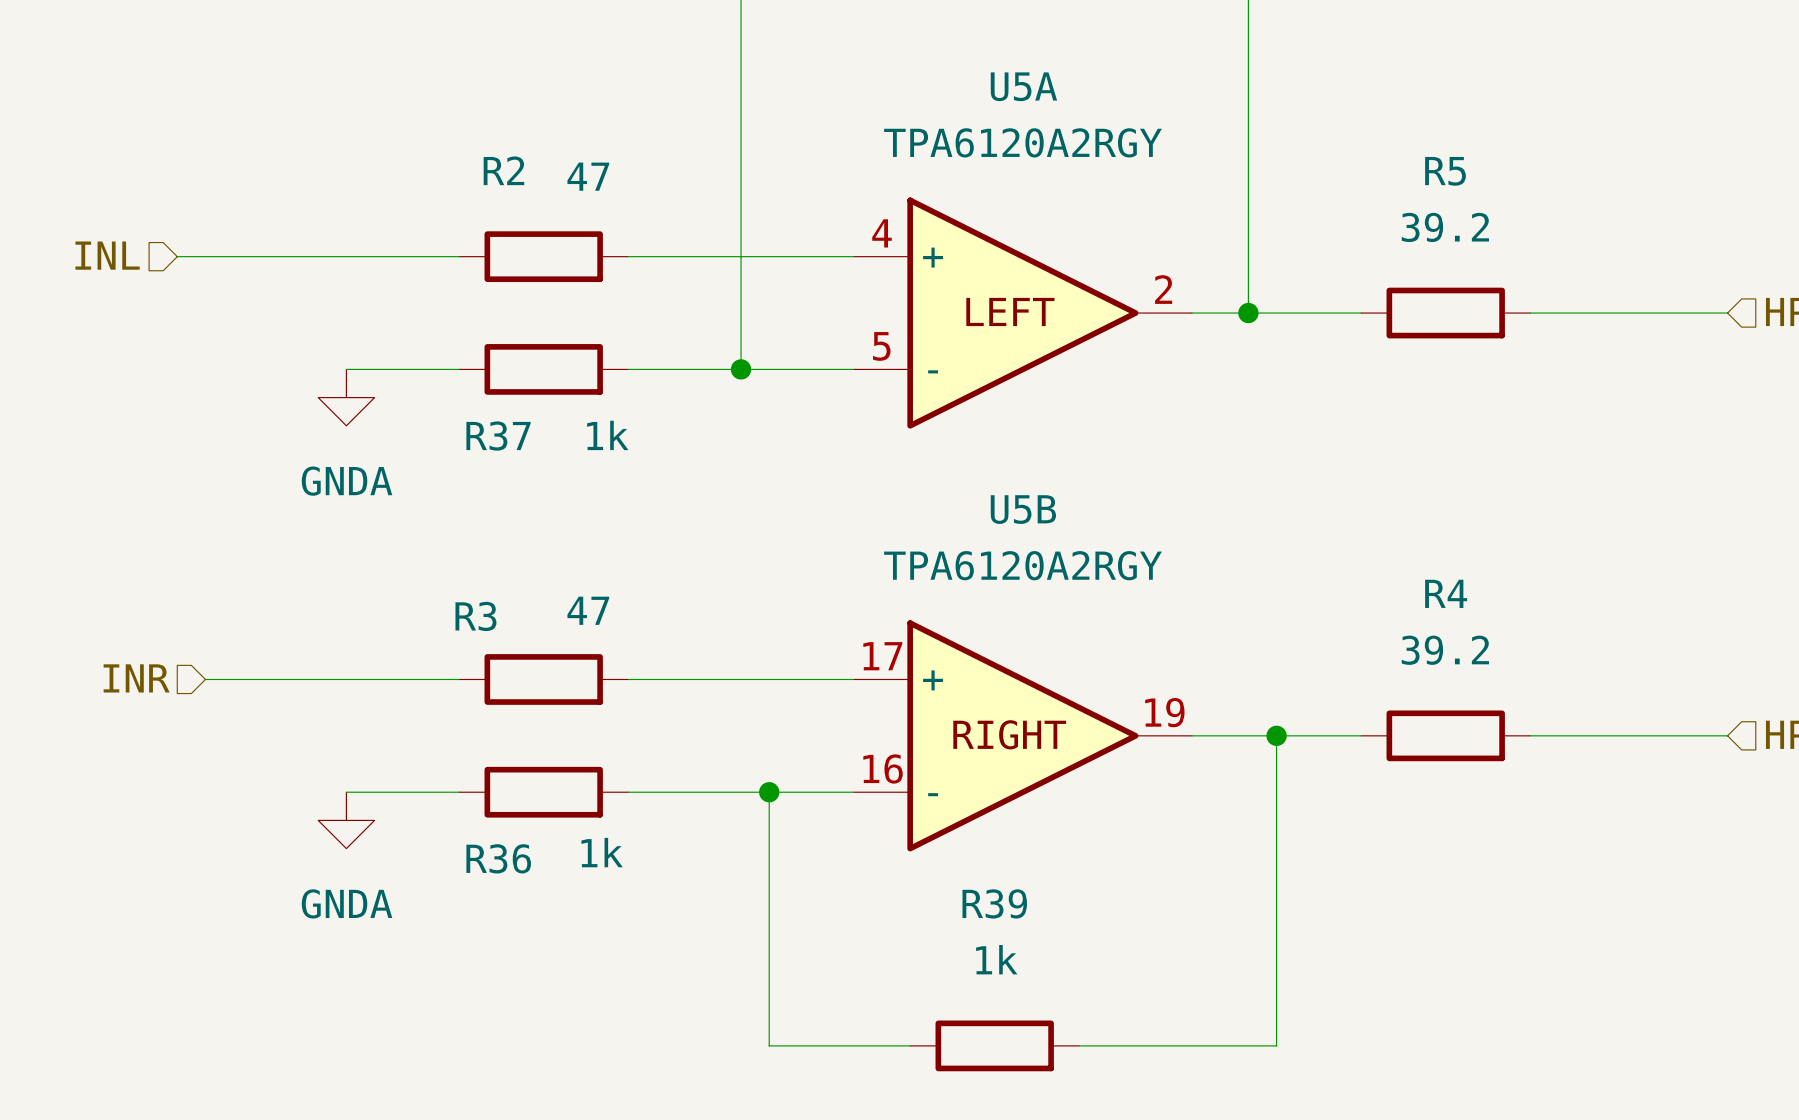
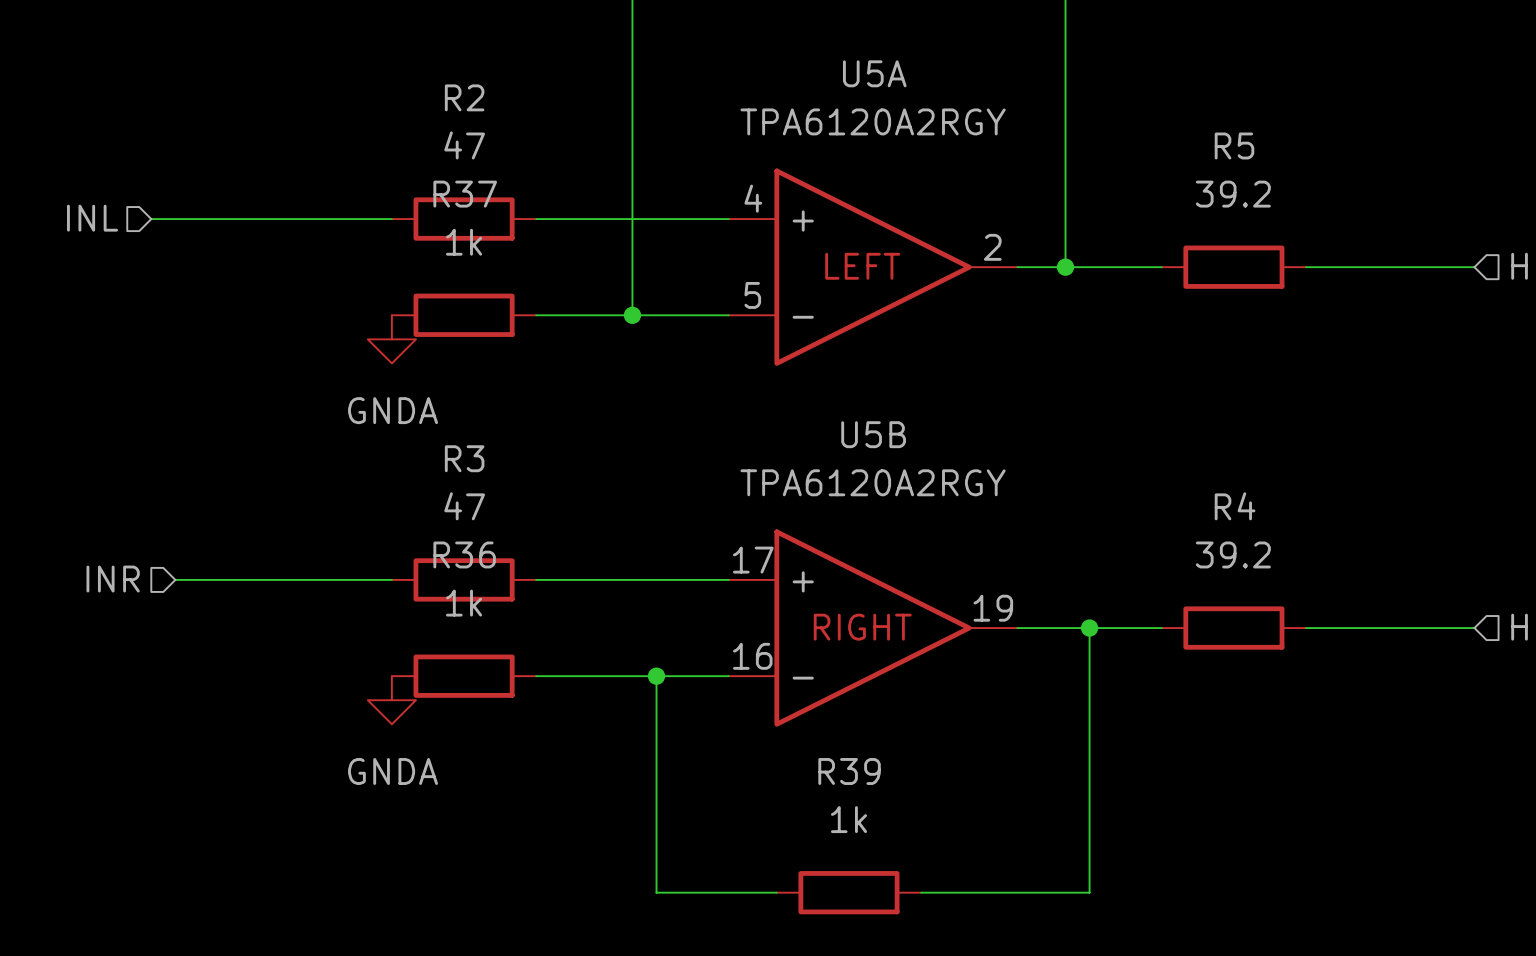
R2 name position: R2 (503, 170) -> R2 (464, 97)
R2 value position: 47 (588, 176) -> 47 (464, 145)
wire: (346, 369) (459, 369) -> none
power symbol position: GNDA (346, 397) -> GNDA (391, 339)
R37 value position: 1k (607, 435) -> 1k (464, 242)
R37 name position: R37 (498, 436) -> R37 (465, 194)
R3 value position: 47 (588, 610) -> 47 (464, 506)
R3 name position: R3 (475, 616) -> R3 (464, 458)
wire: (346, 792) (459, 792) -> none
power symbol position: GNDA (346, 820) -> GNDA (391, 700)
R36 value position: 1k (602, 852) -> 1k (464, 603)
R36 name position: R36 (498, 858) -> R36 (464, 554)

